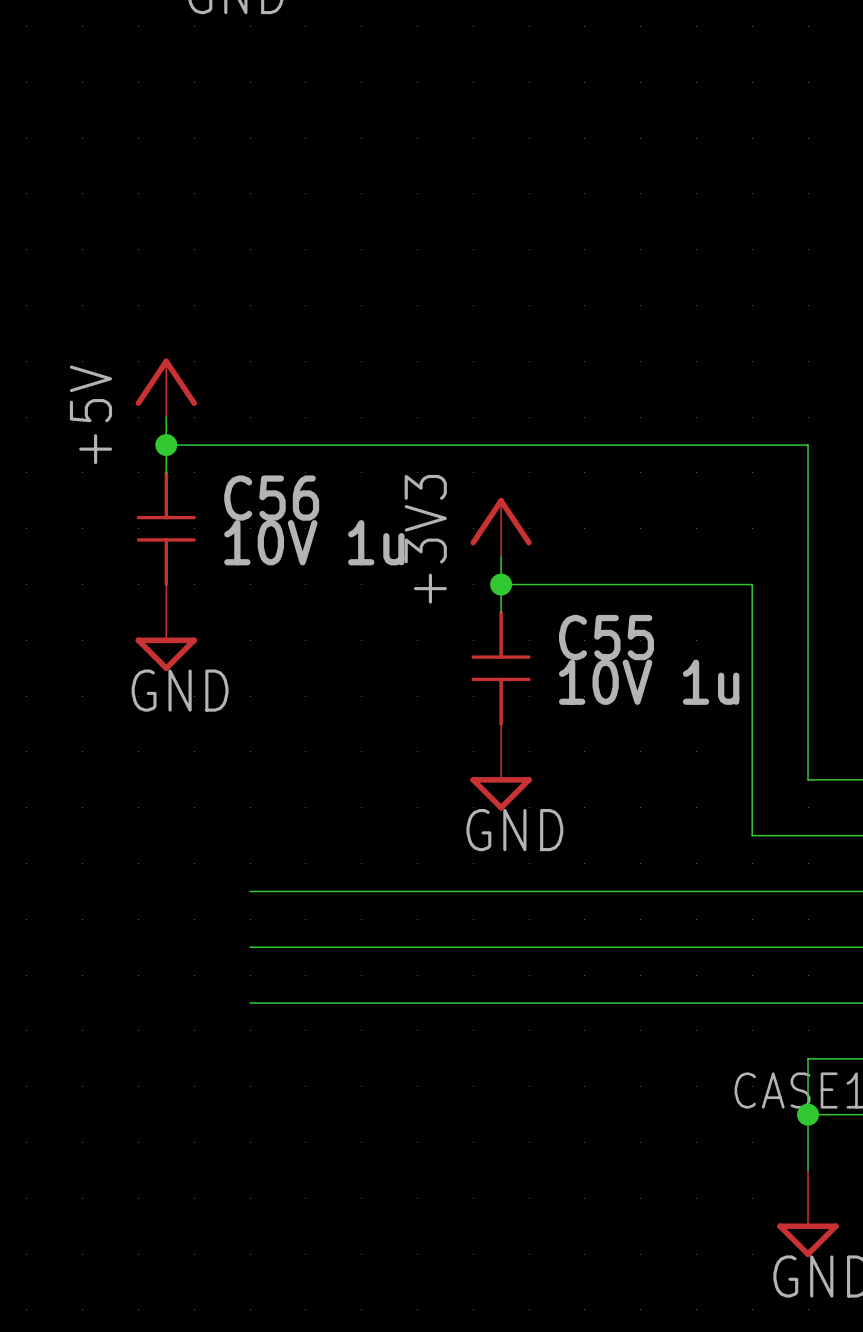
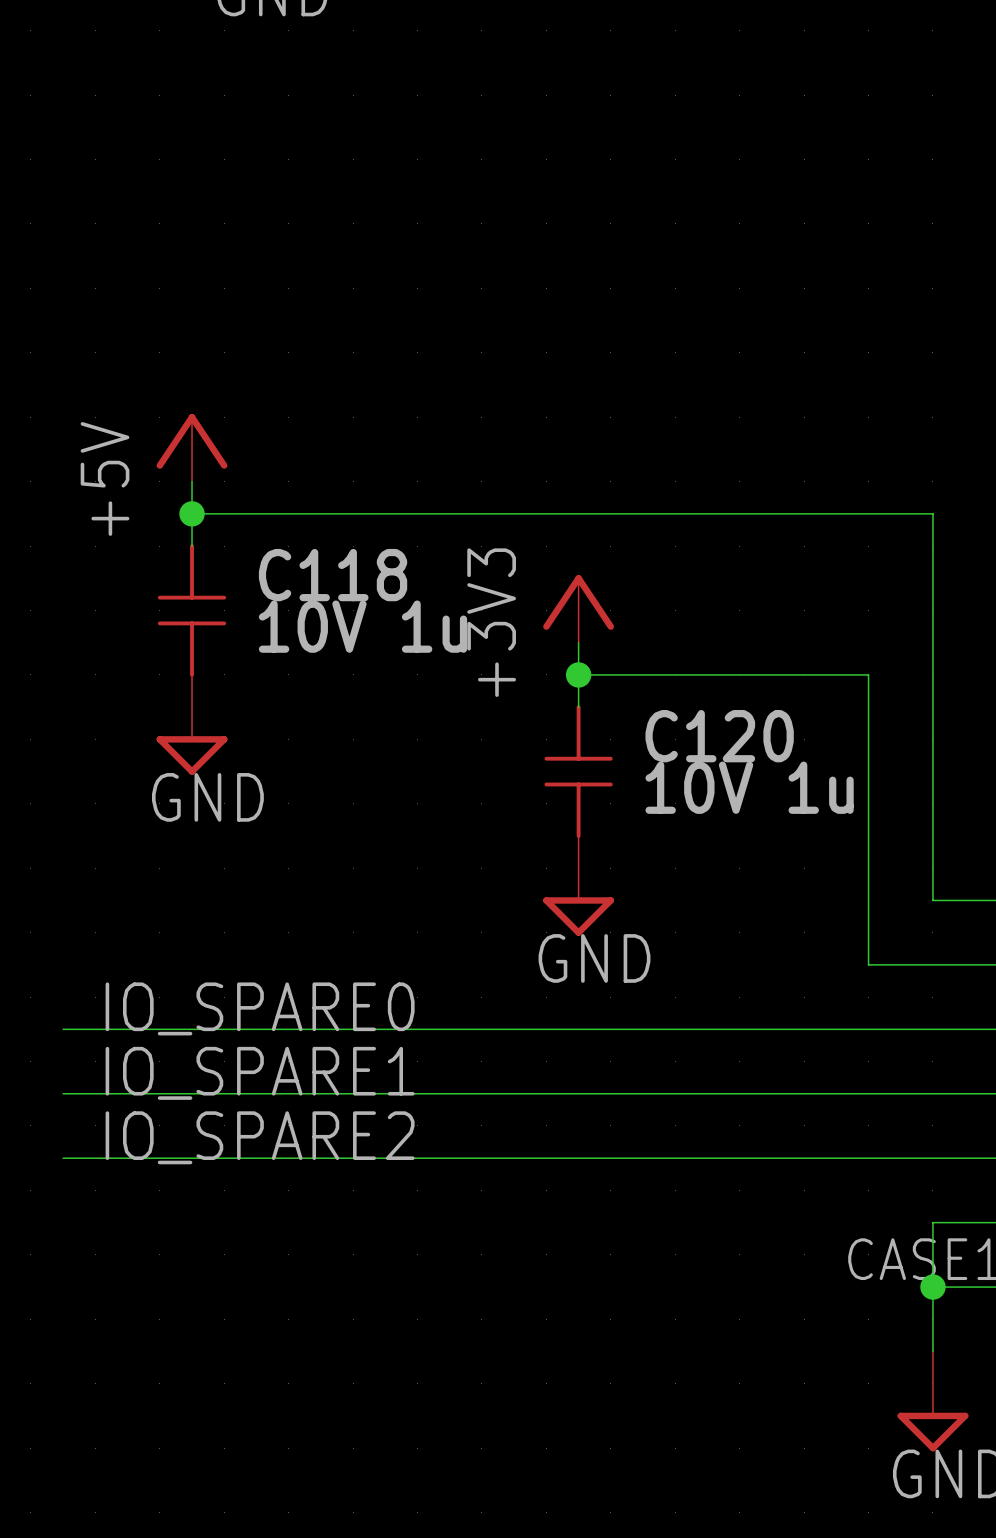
C56 name: C56 (271, 498) -> C118 (333, 575)
C55 name: C55 (606, 637) -> C120 (719, 736)
label: none -> IO_SPARE0 (260, 1008)
wire: none -> (63, 1029) (288, 1029)
label: none -> IO_SPARE1 (260, 1073)
wire: none -> (63, 1093) (288, 1093)
label: none -> IO_SPARE2 (260, 1137)
wire: none -> (63, 1158) (288, 1158)

